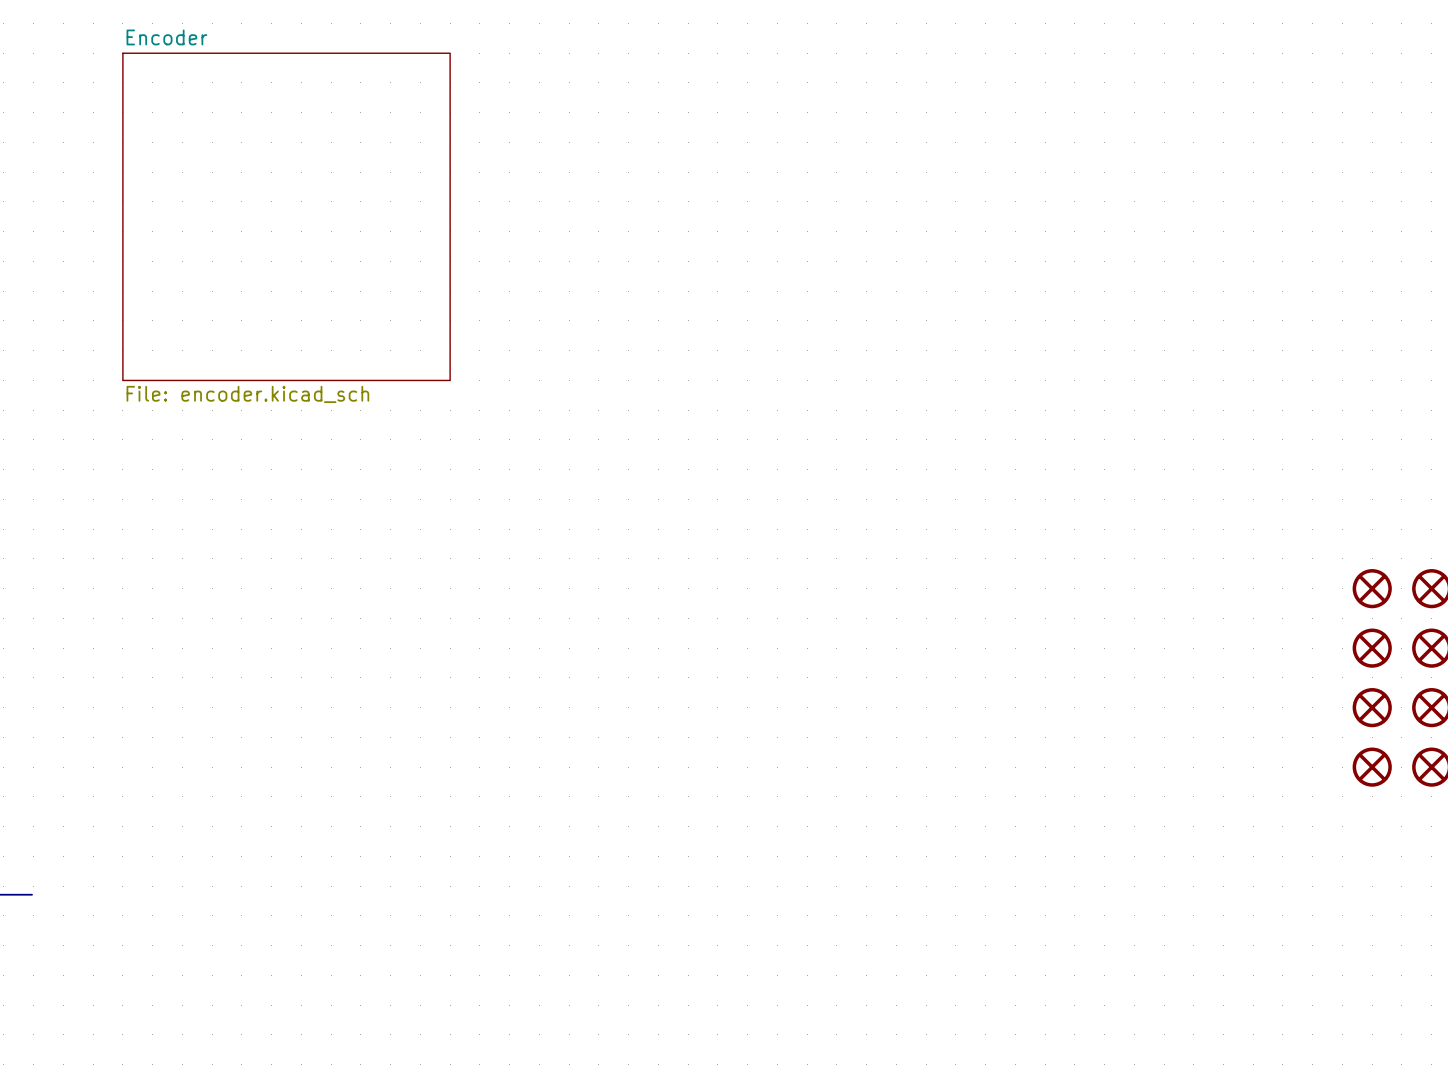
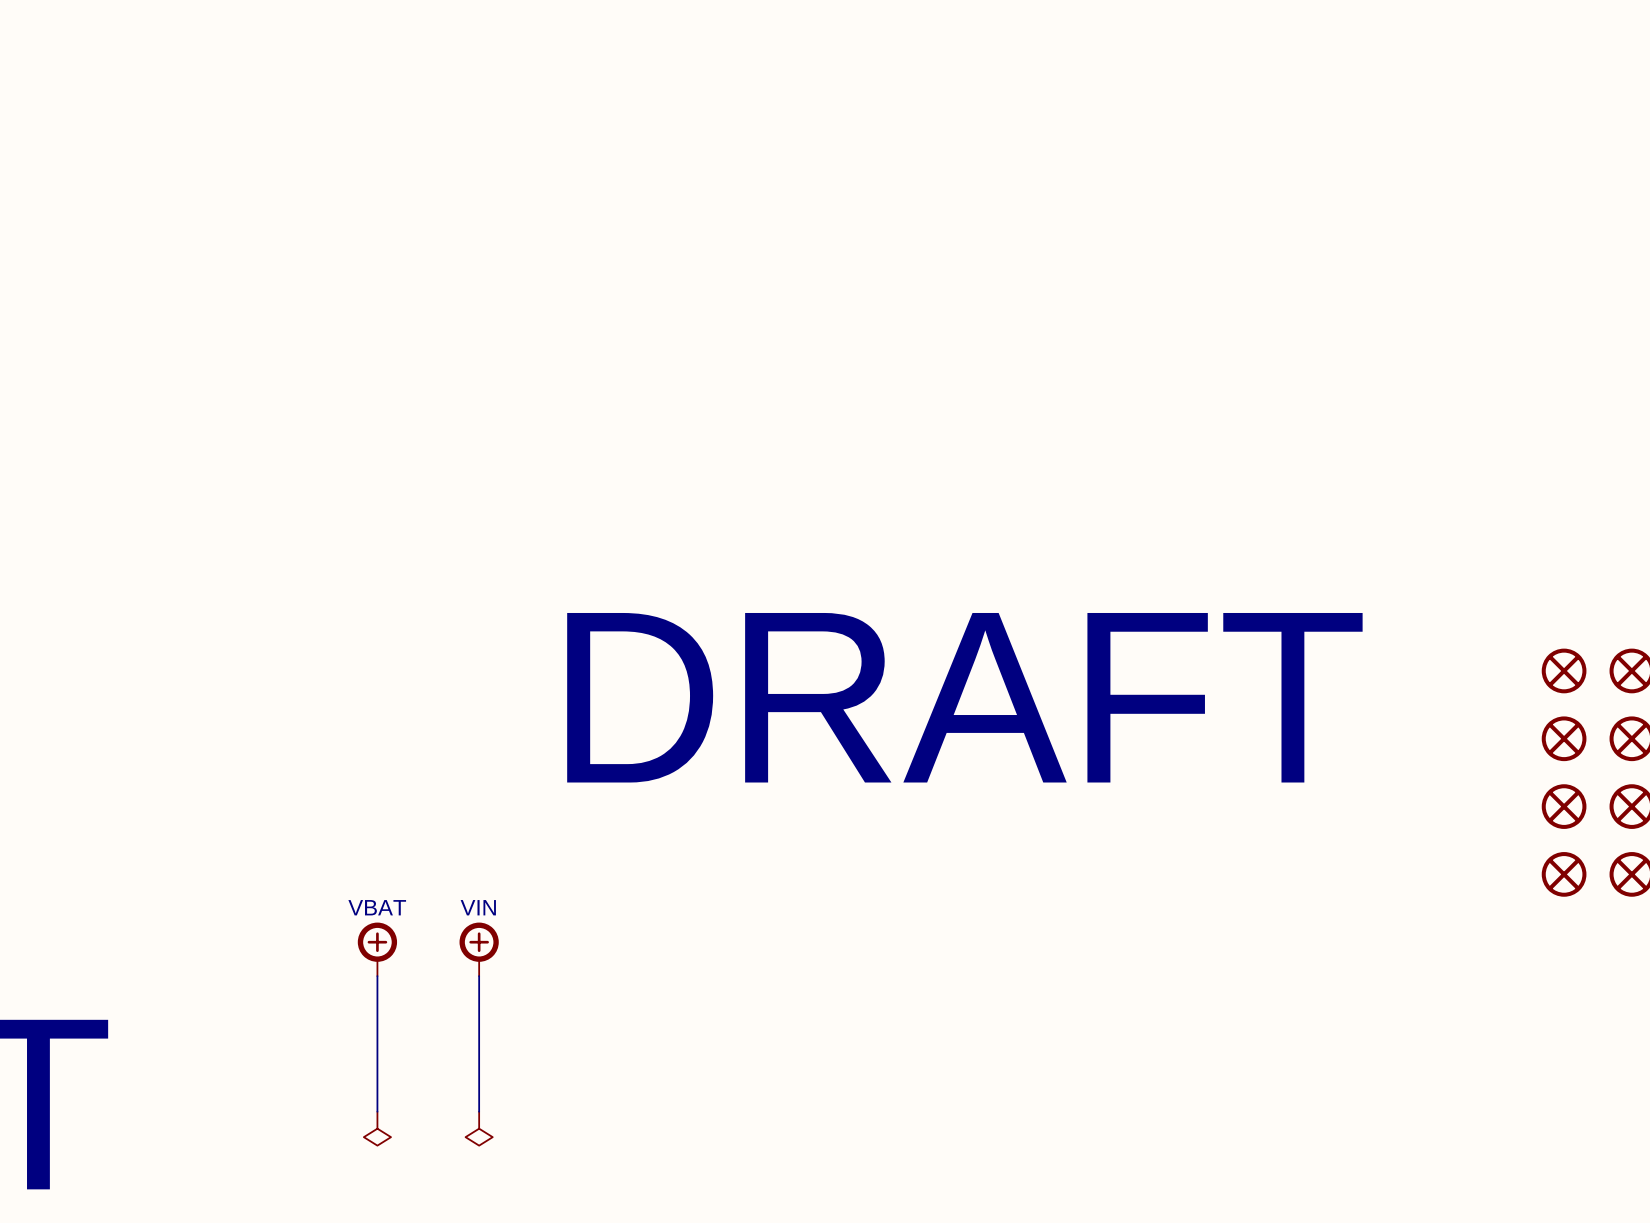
sheet Encoder: File: encoder.kicad_sch (286, 216) -> none
text: none -> DRAFT (964, 697)
power symbol: none -> (377, 949)
power symbol: none -> (479, 949)
wire: none -> (377, 976) (377, 1111)
wire: none -> (479, 976) (479, 1111)
power symbol: none -> (377, 1128)
power symbol: none -> (479, 1128)

